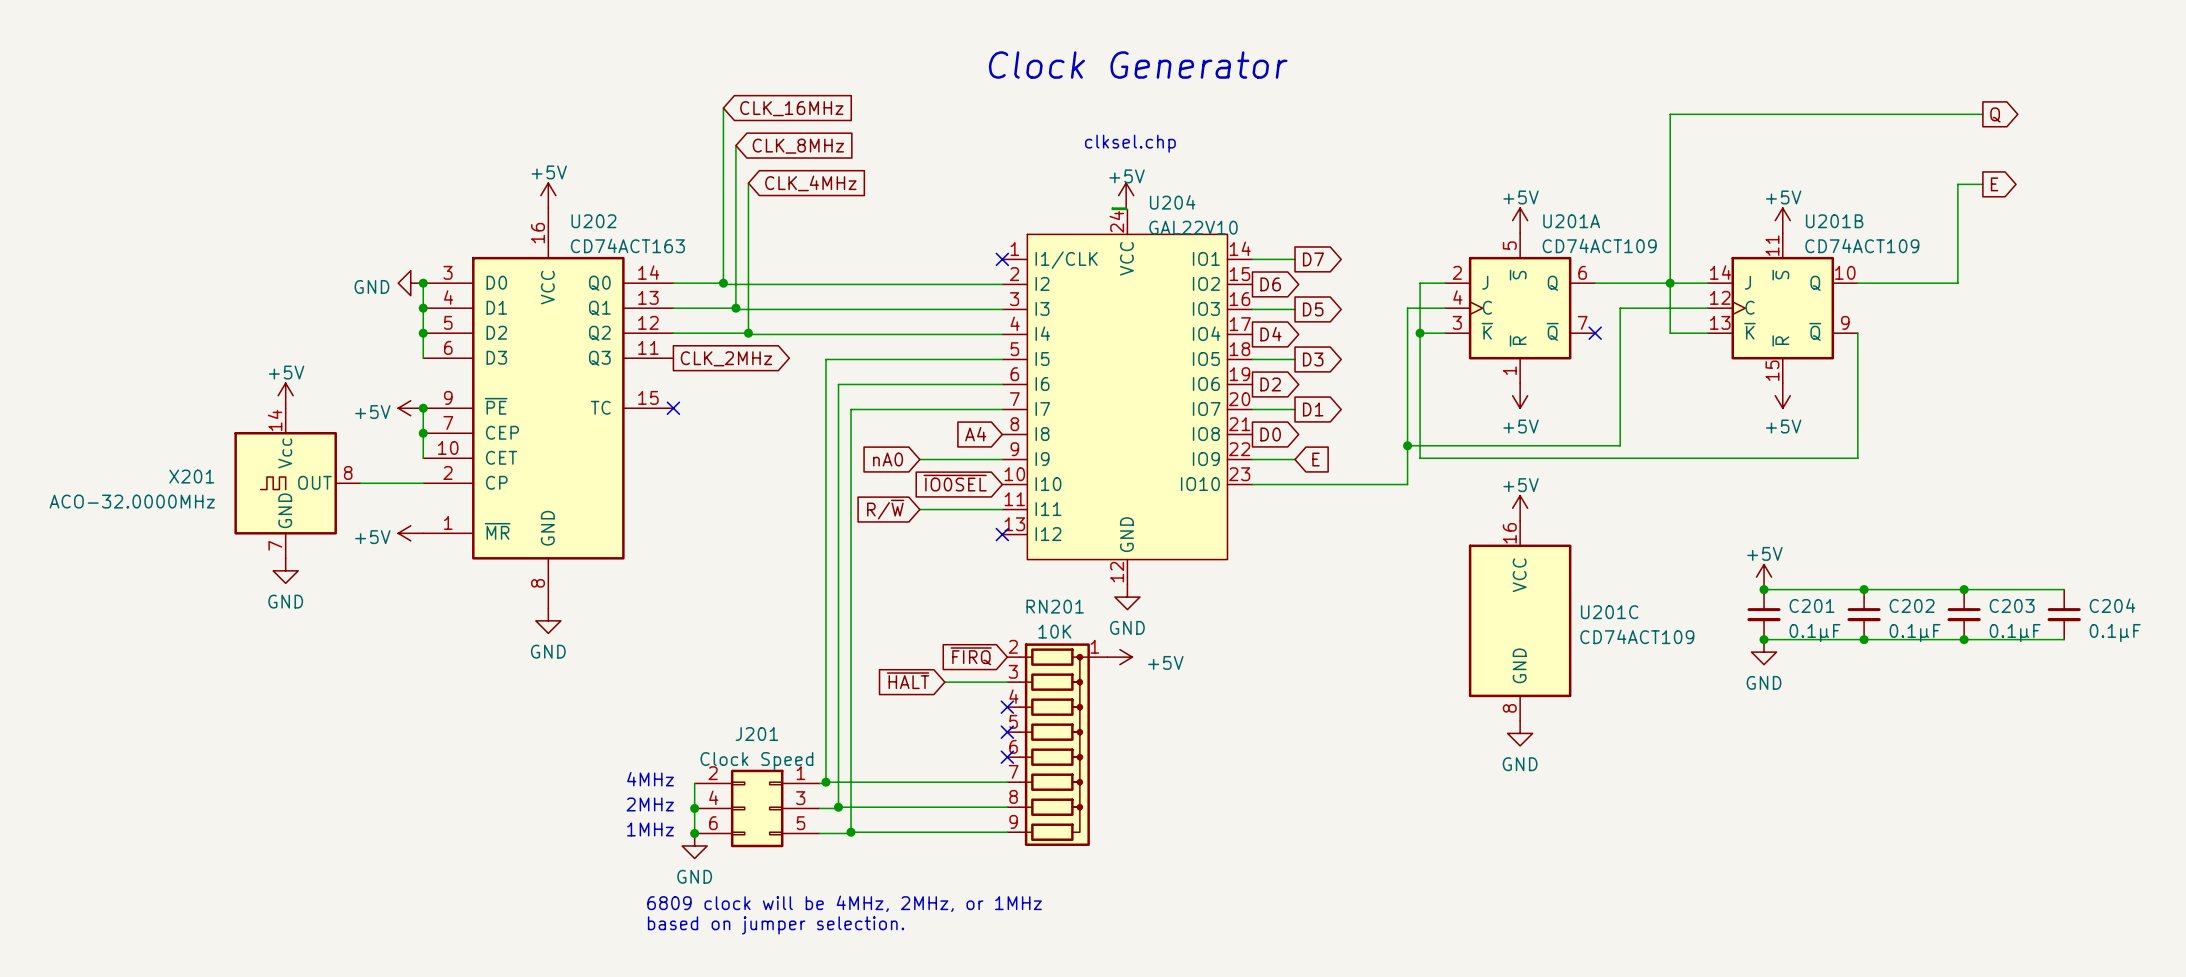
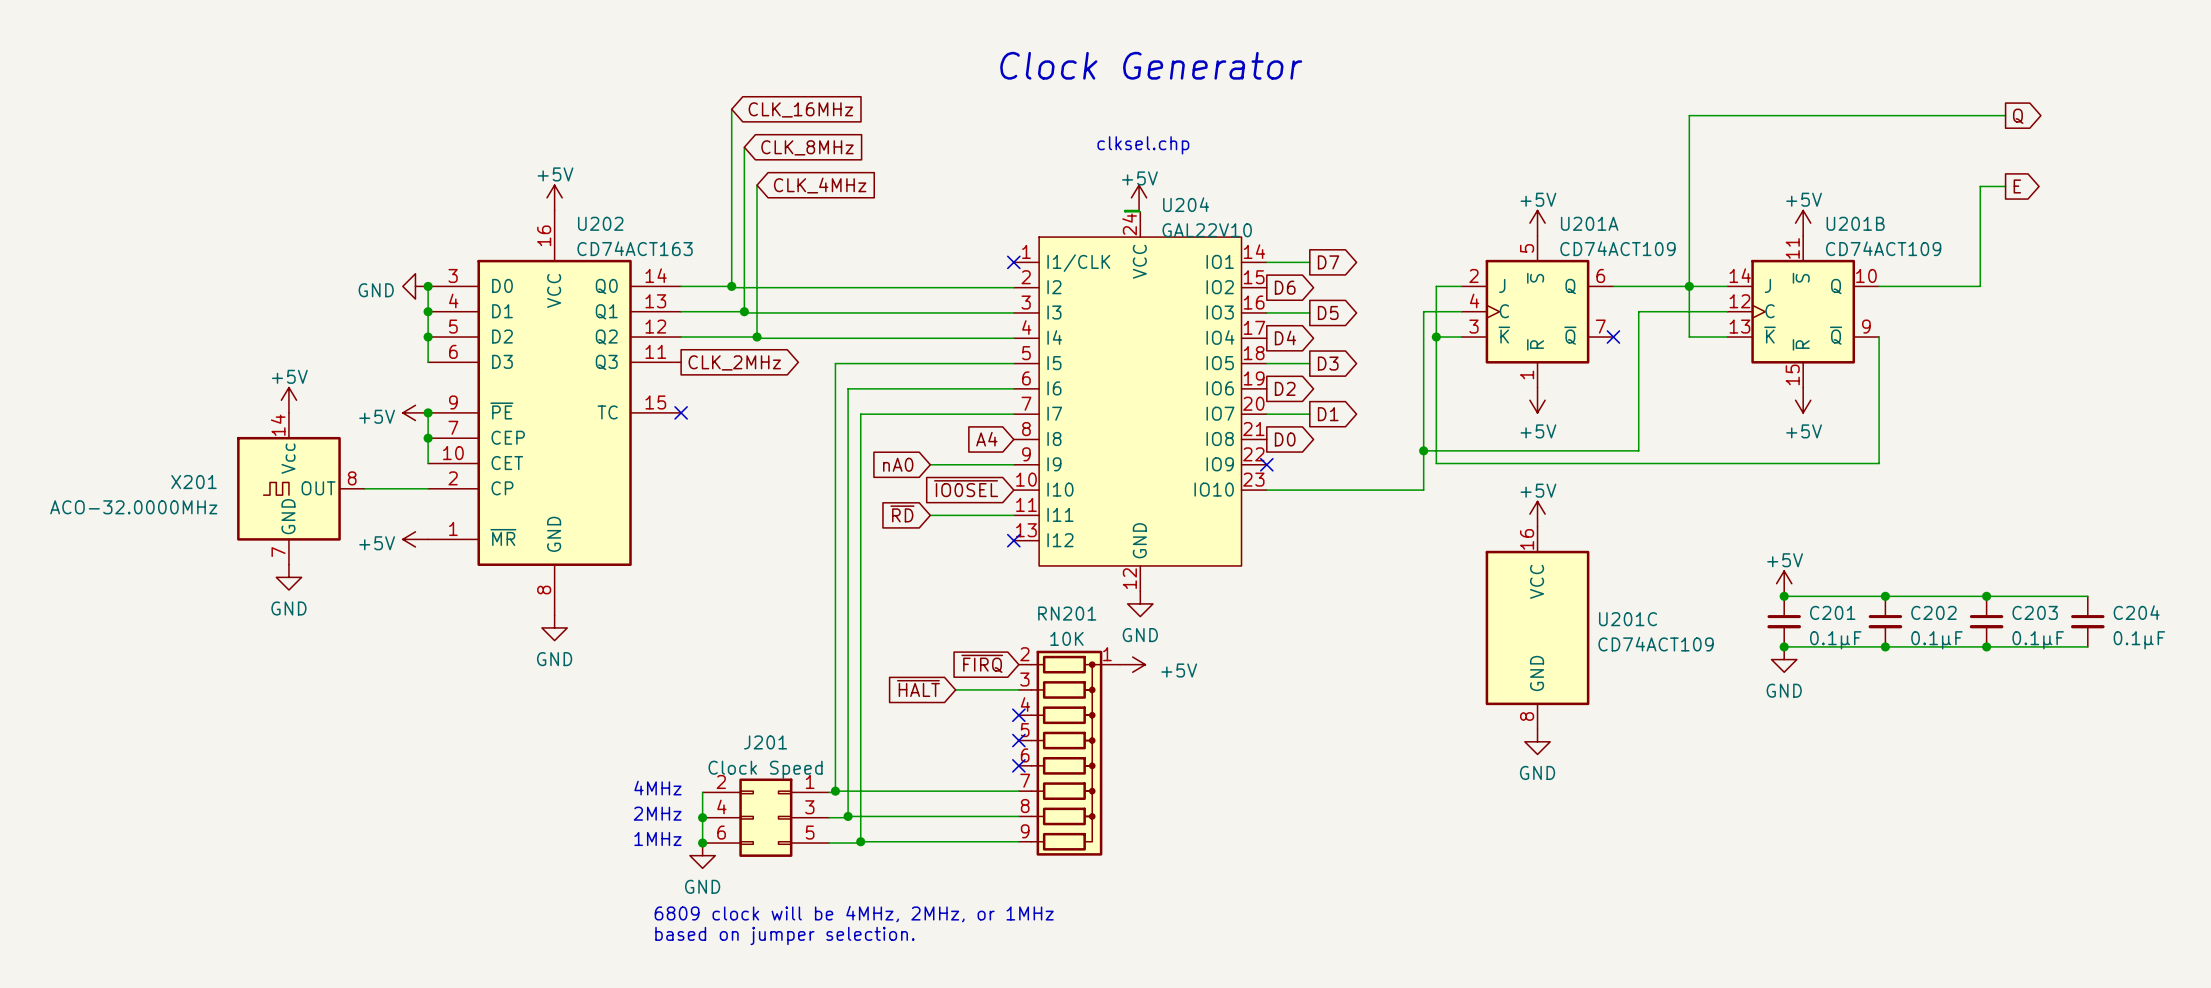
wire: (1252, 459) (1295, 459) -> none
no-connect mark: none -> (1266, 464)
global label: E (1316, 459) -> none
global label: R/~{W} (885, 509) -> ~{RD} (902, 513)

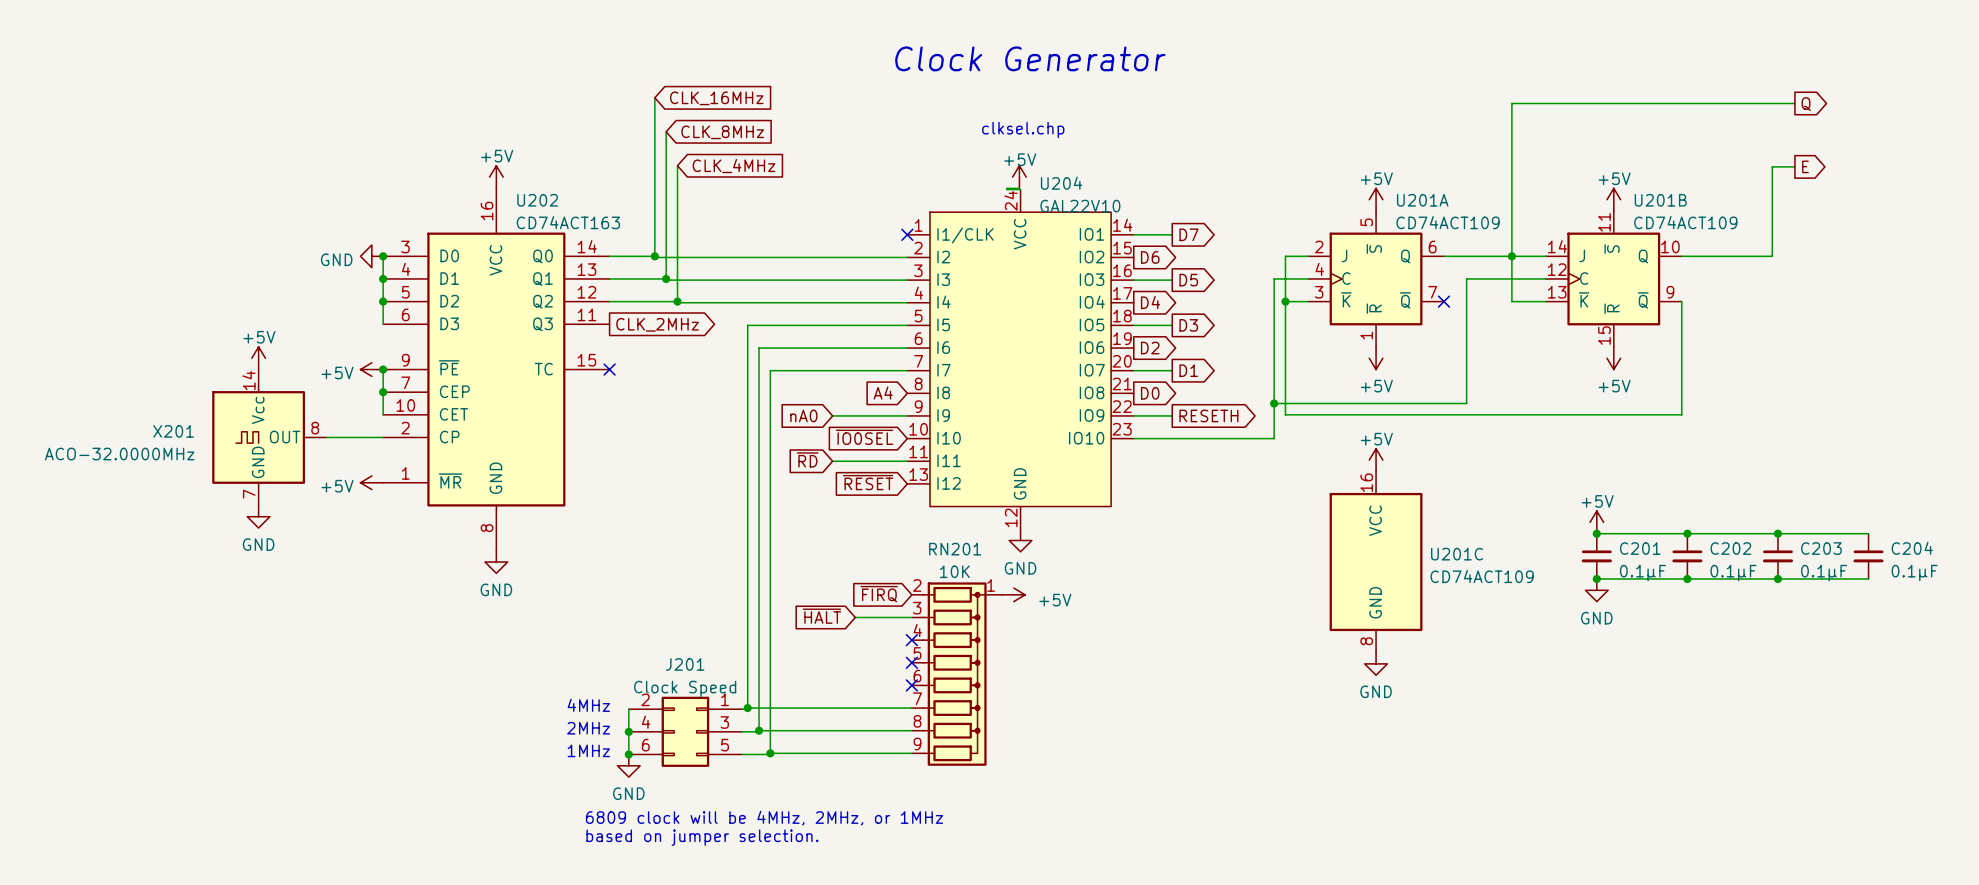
wire: none -> (1133, 415) (1172, 415)
no-connect mark: (1266, 464) -> none
global label: none -> RESETH (1208, 415)
global label: none -> ~{RESET} (868, 482)
no-connect mark: (1013, 540) -> none

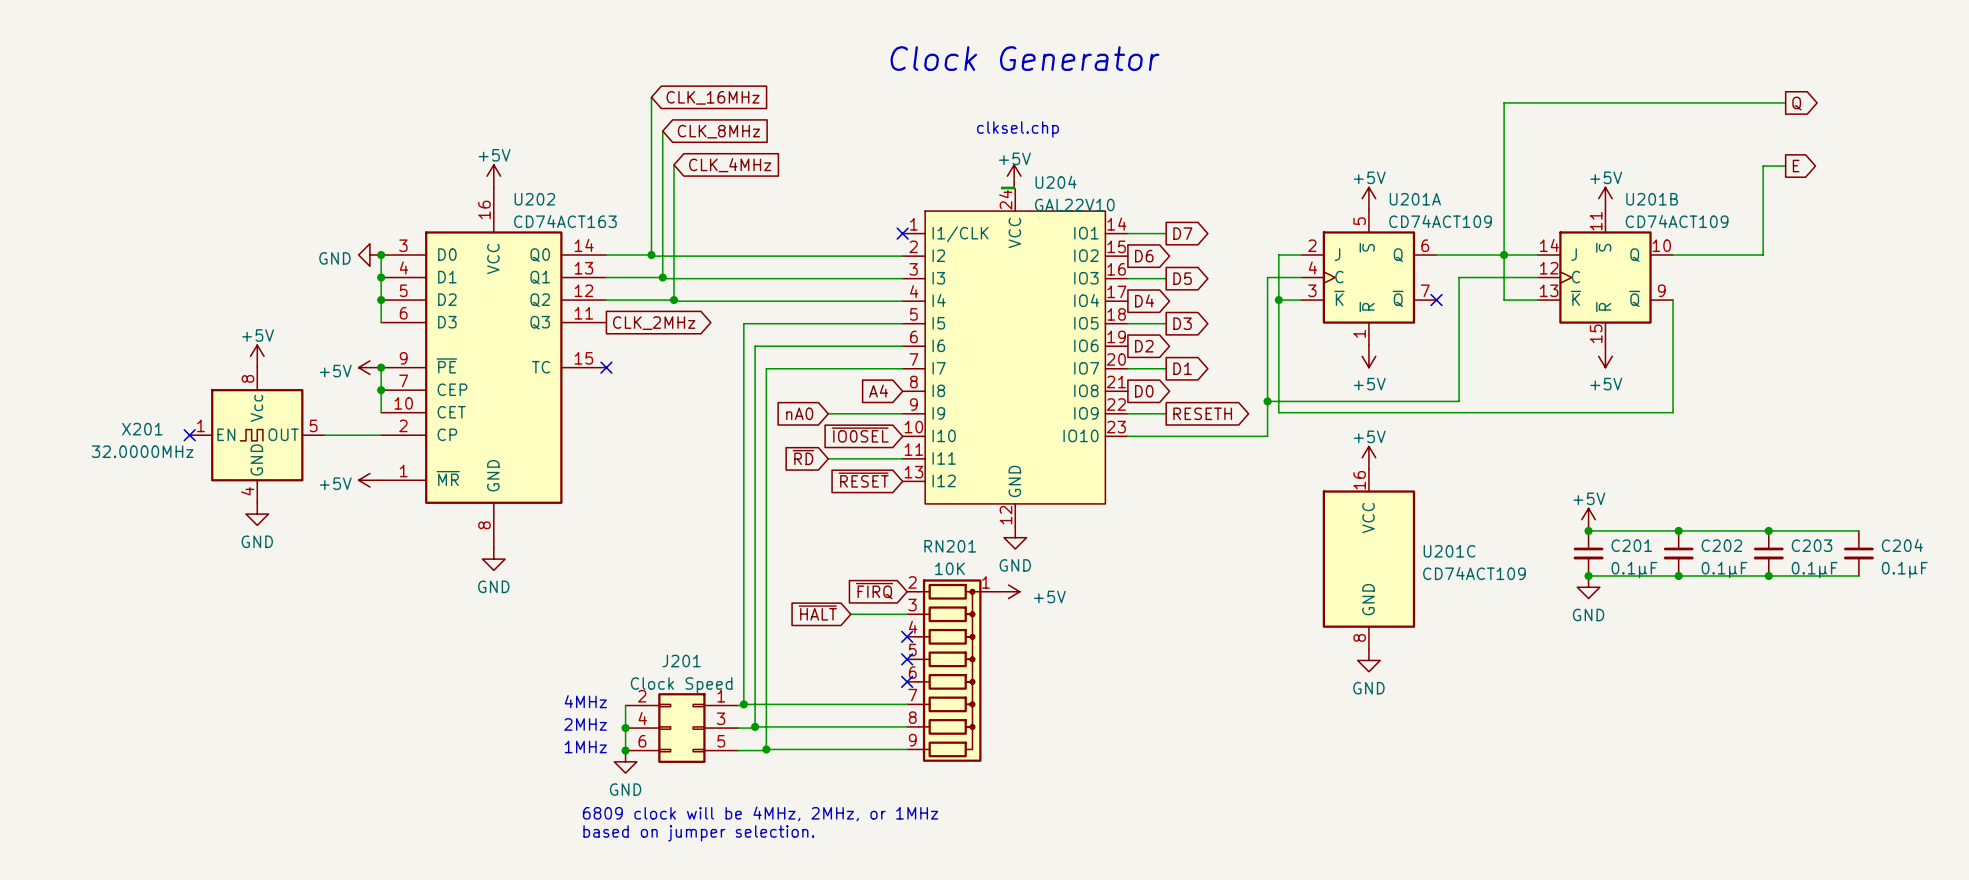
X201 symbol: [212, 369, 327, 506] -> [189, 367, 325, 503]
X201 name position: X201 (173, 431) -> X201 (142, 429)
no-connect mark: none -> (189, 435)
X201 value: ACO-32.0000MHz (119, 454) -> 32.0000MHz (142, 451)

